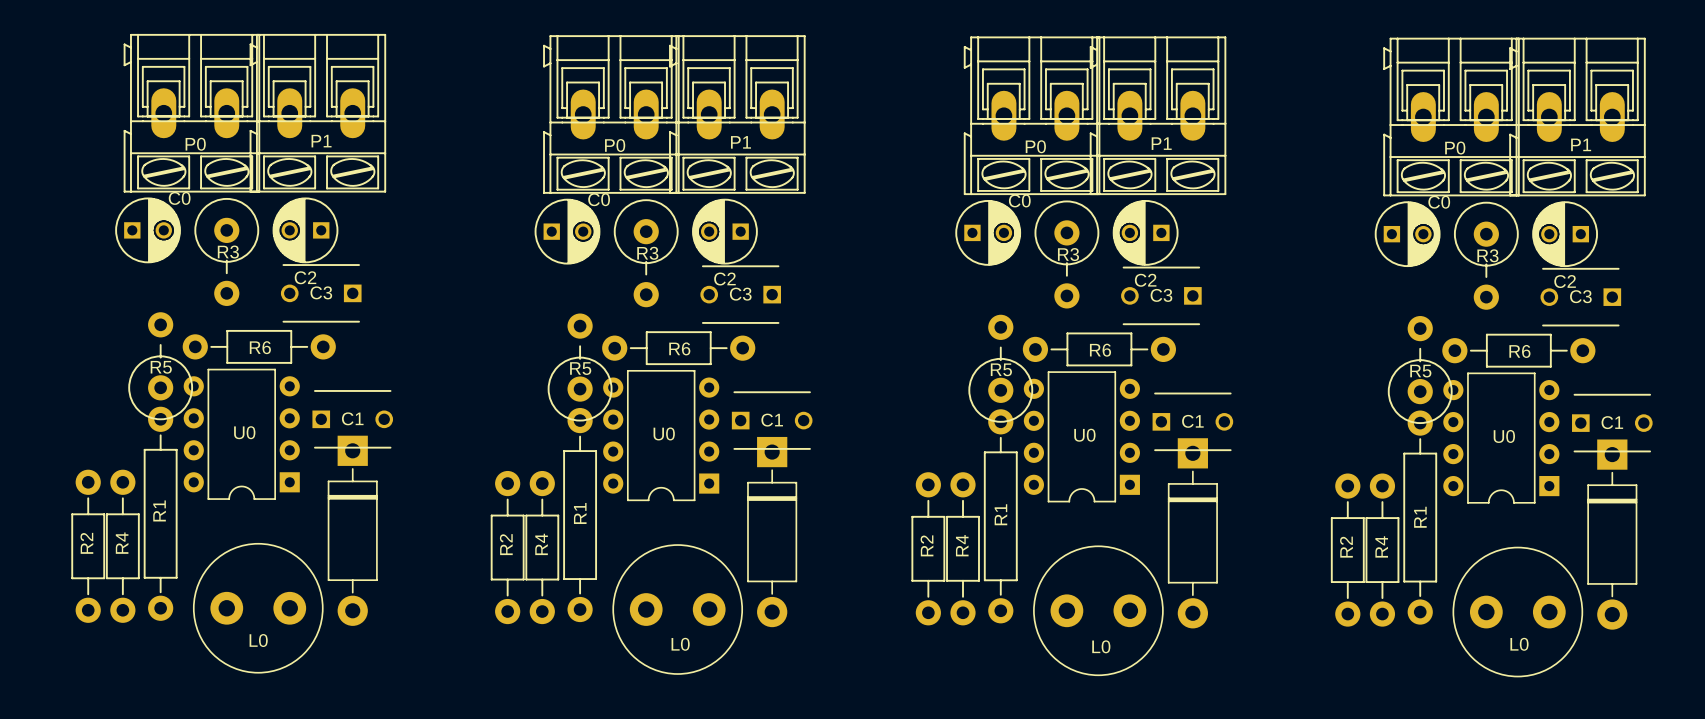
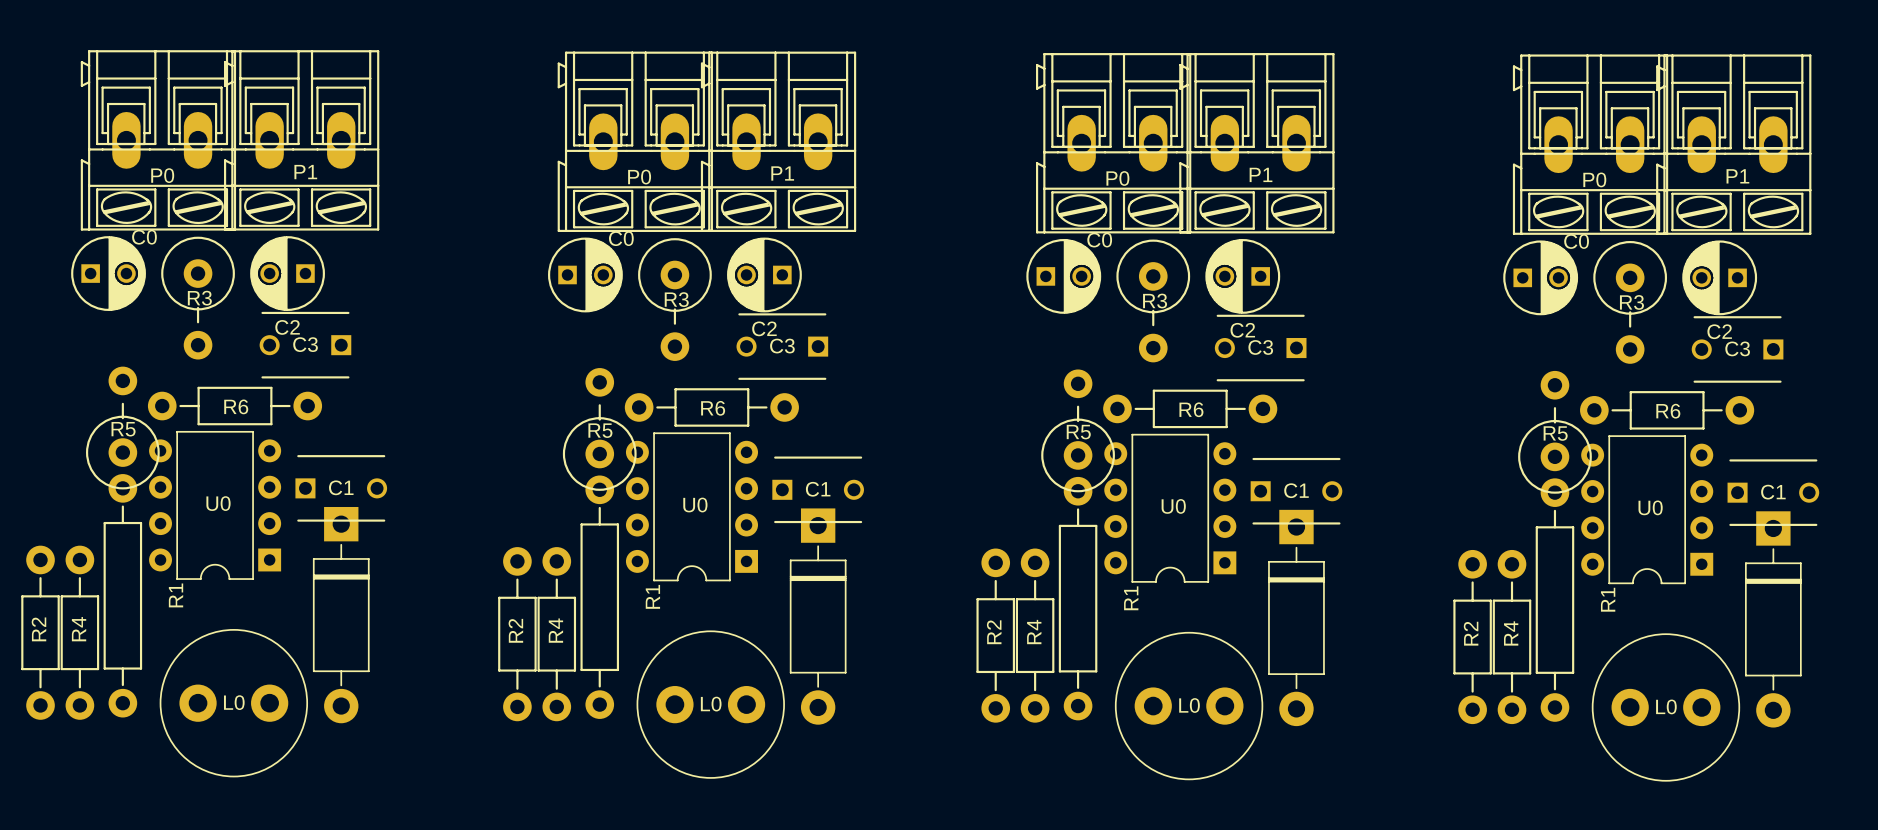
R1 name position: R1 (159, 510) -> R1 (176, 595)
R1 name position: R1 (580, 513) -> R1 (652, 596)
R1 name position: R1 (1000, 514) -> R1 (1131, 598)
R1 name position: R1 (1420, 517) -> R1 (1608, 599)
L0 name position: L0 (258, 640) -> L0 (234, 702)
L0 name position: L0 (680, 644) -> L0 (711, 704)
L0 name position: L0 (1519, 644) -> L0 (1666, 706)
L0 name position: L0 (1101, 646) -> L0 (1189, 705)

